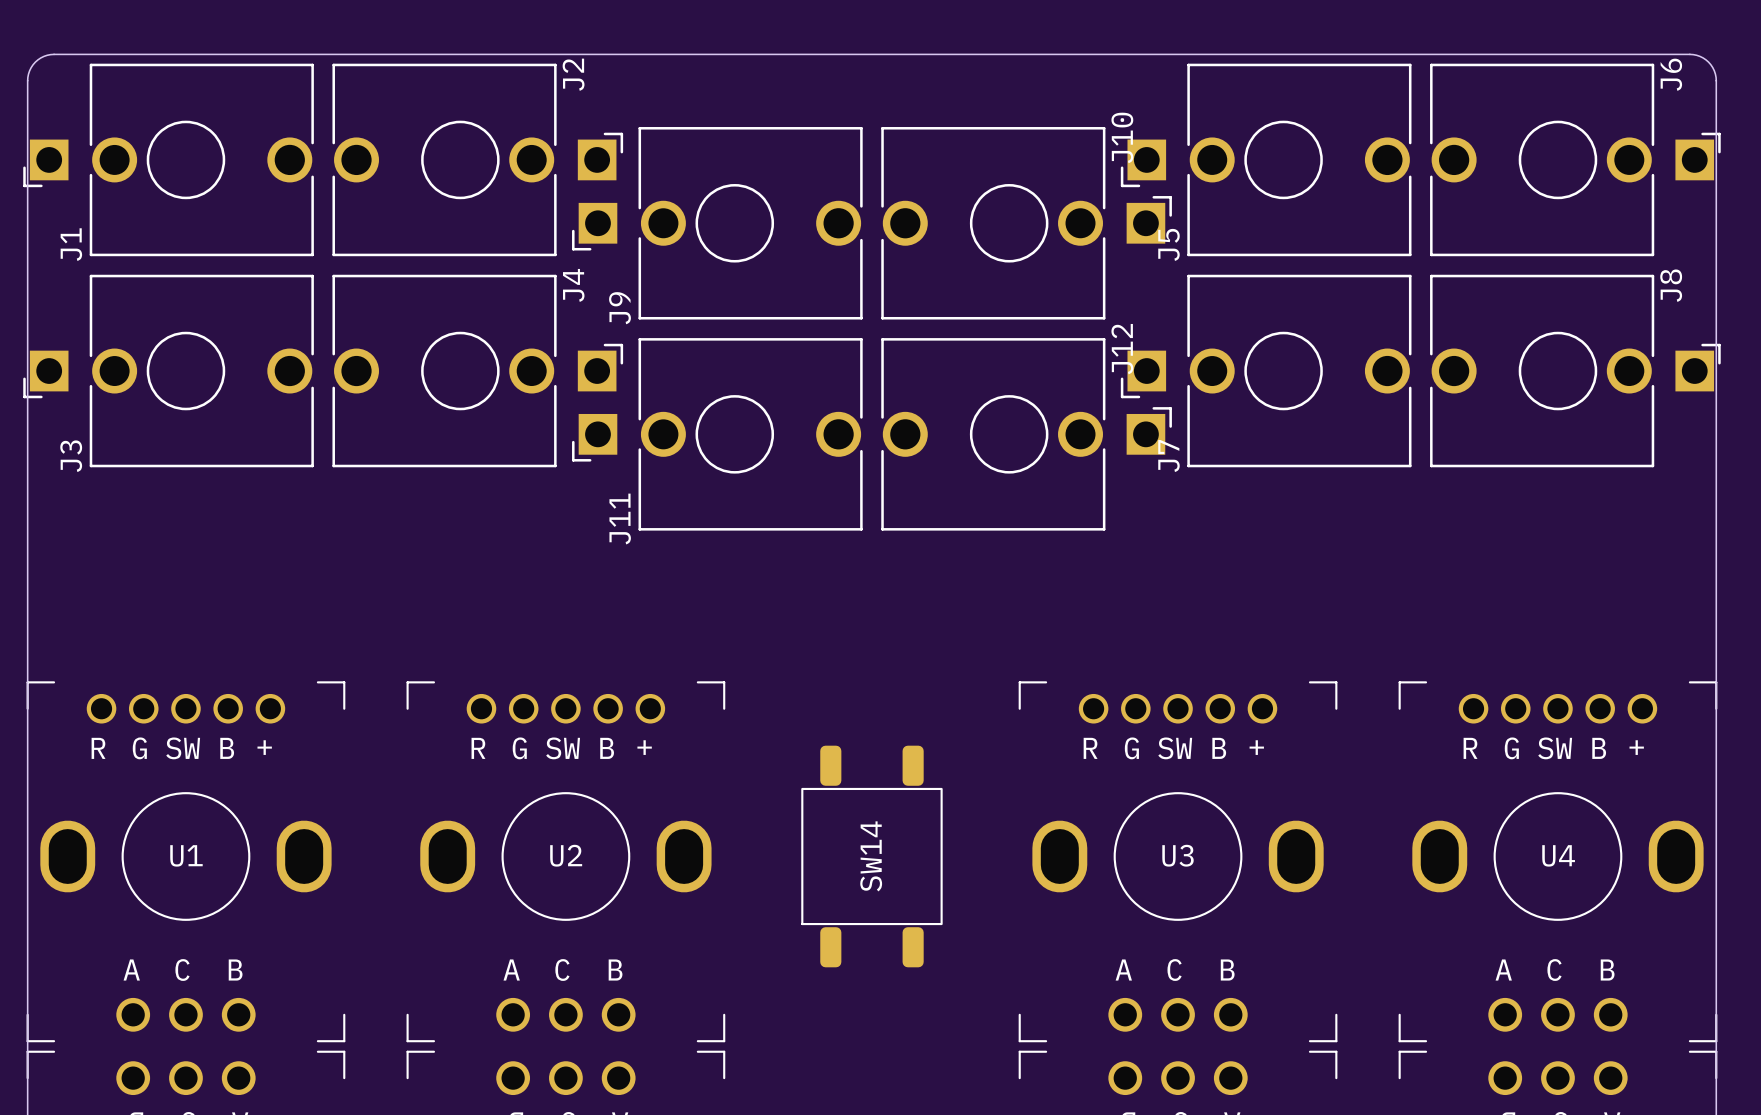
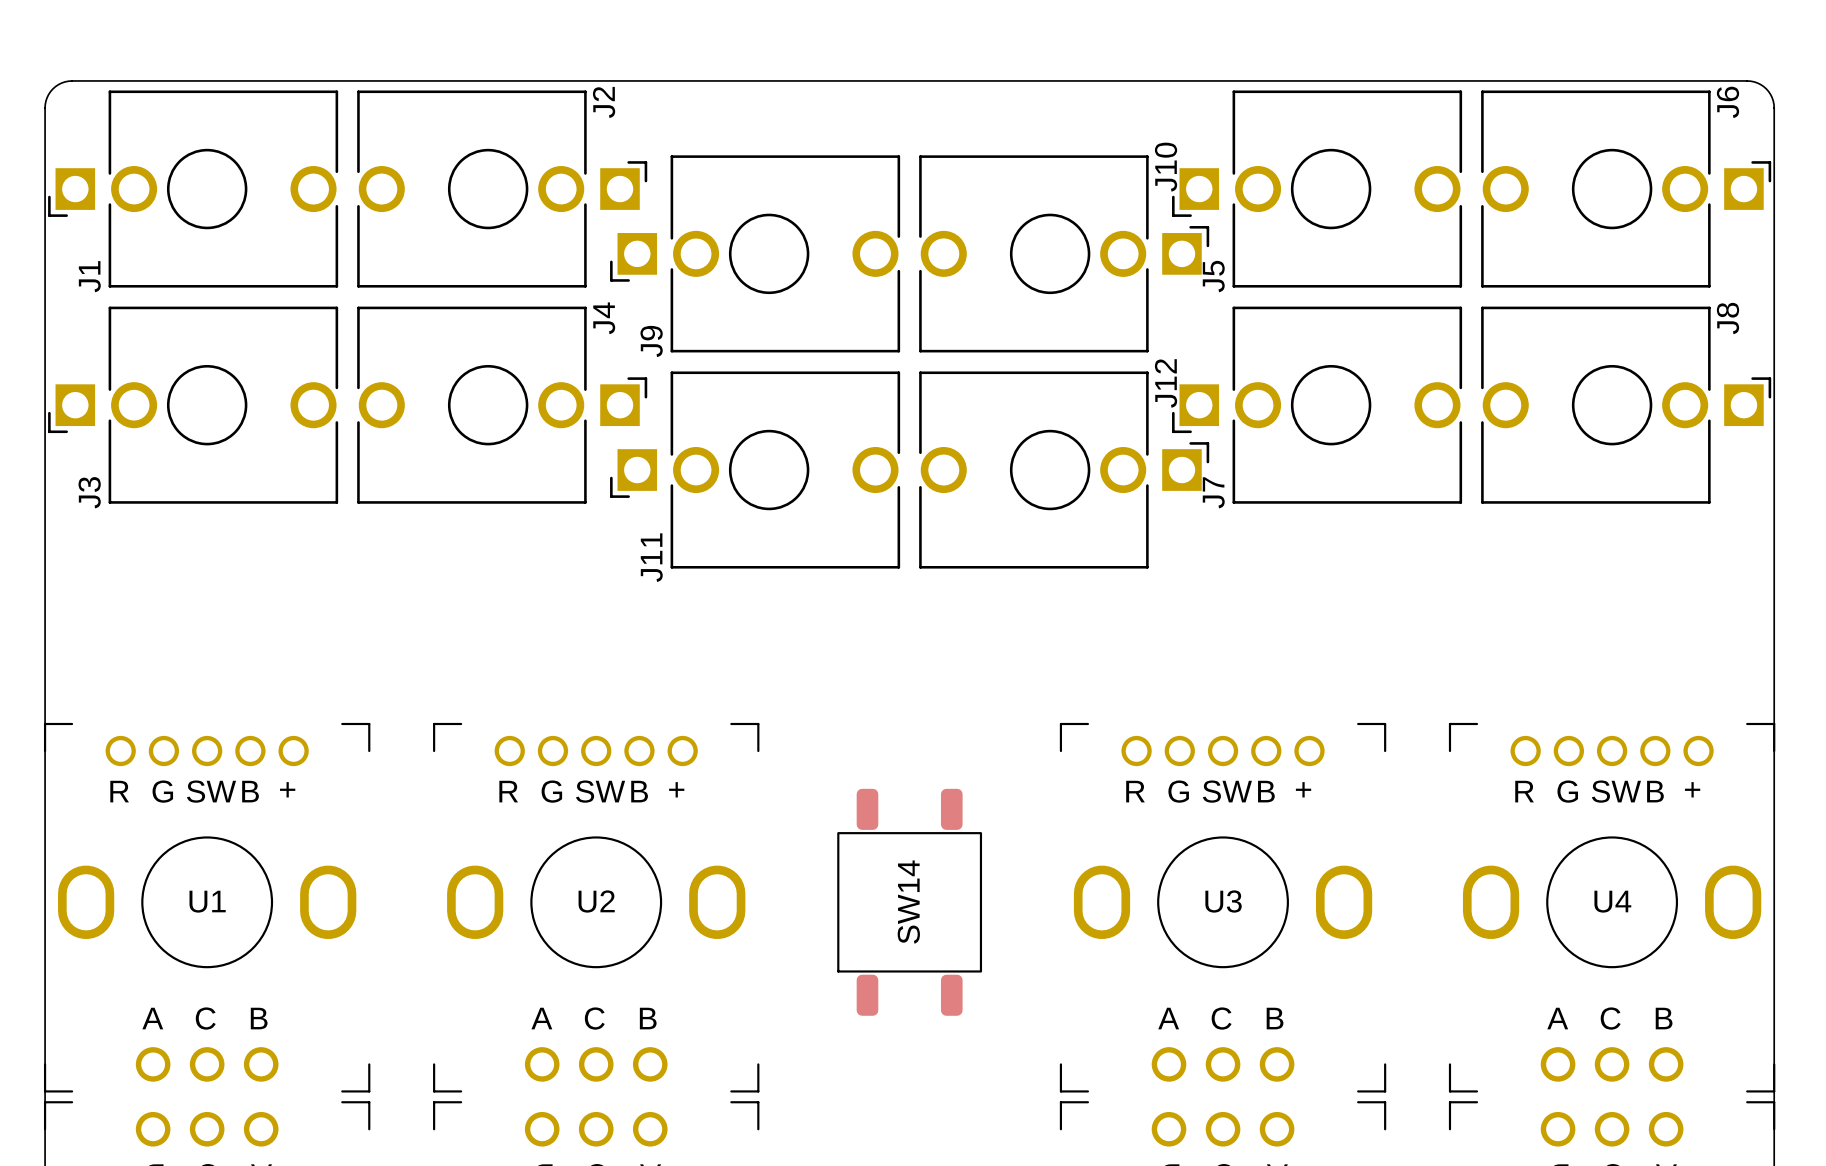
J1 footprint: [23, 63, 314, 257] -> [48, 90, 339, 288]
J2 footprint: [332, 63, 624, 257] -> [357, 90, 648, 288]
J5 footprint: [1120, 63, 1412, 257] -> [1172, 90, 1463, 288]
J6 footprint: [1430, 63, 1721, 257] -> [1481, 90, 1772, 288]
J9 footprint: [572, 127, 863, 320] -> [610, 155, 901, 353]
J10 footprint: [881, 127, 1172, 320] -> [919, 155, 1210, 353]
J3 footprint: [23, 274, 314, 468] -> [48, 306, 339, 504]
J4 footprint: [332, 274, 624, 468] -> [357, 306, 648, 504]
J7 footprint: [1120, 274, 1412, 468] -> [1172, 306, 1463, 504]
J8 footprint: [1430, 274, 1721, 468] -> [1481, 306, 1772, 504]
J11 footprint: [572, 338, 863, 531] -> [610, 371, 901, 569]
J12 footprint: [881, 338, 1172, 531] -> [919, 371, 1210, 569]

